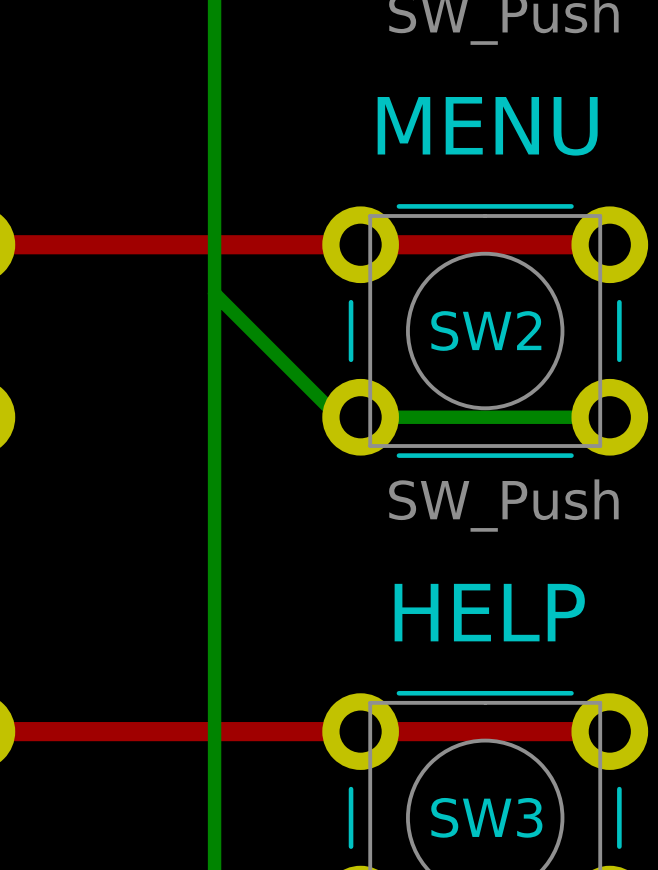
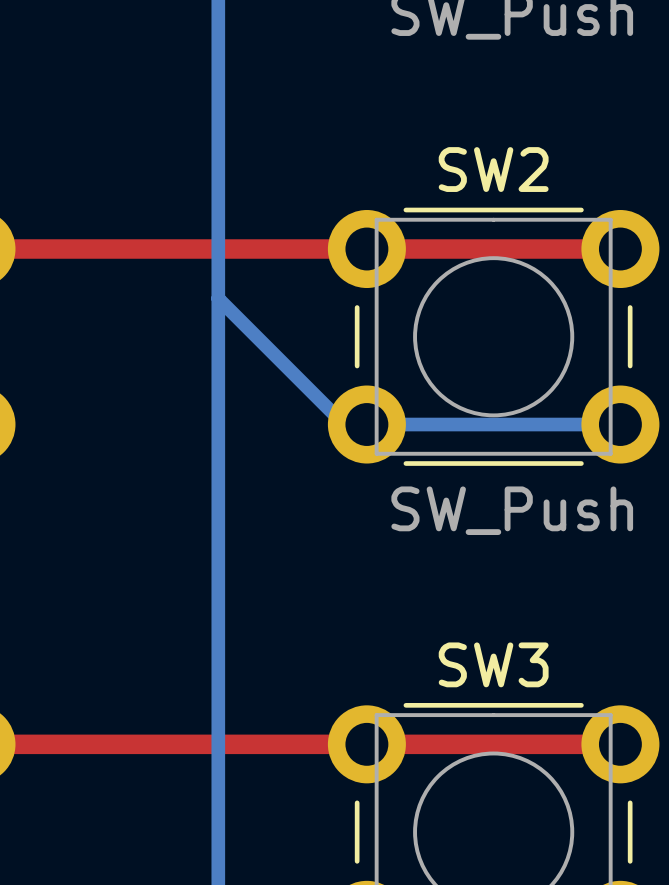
text: MENU (487, 126) -> none
SW2 name position: SW2 (486, 330) -> SW2 (493, 169)
text: HELP (489, 612) -> none
SW3 name position: SW3 (486, 817) -> SW3 (493, 664)

